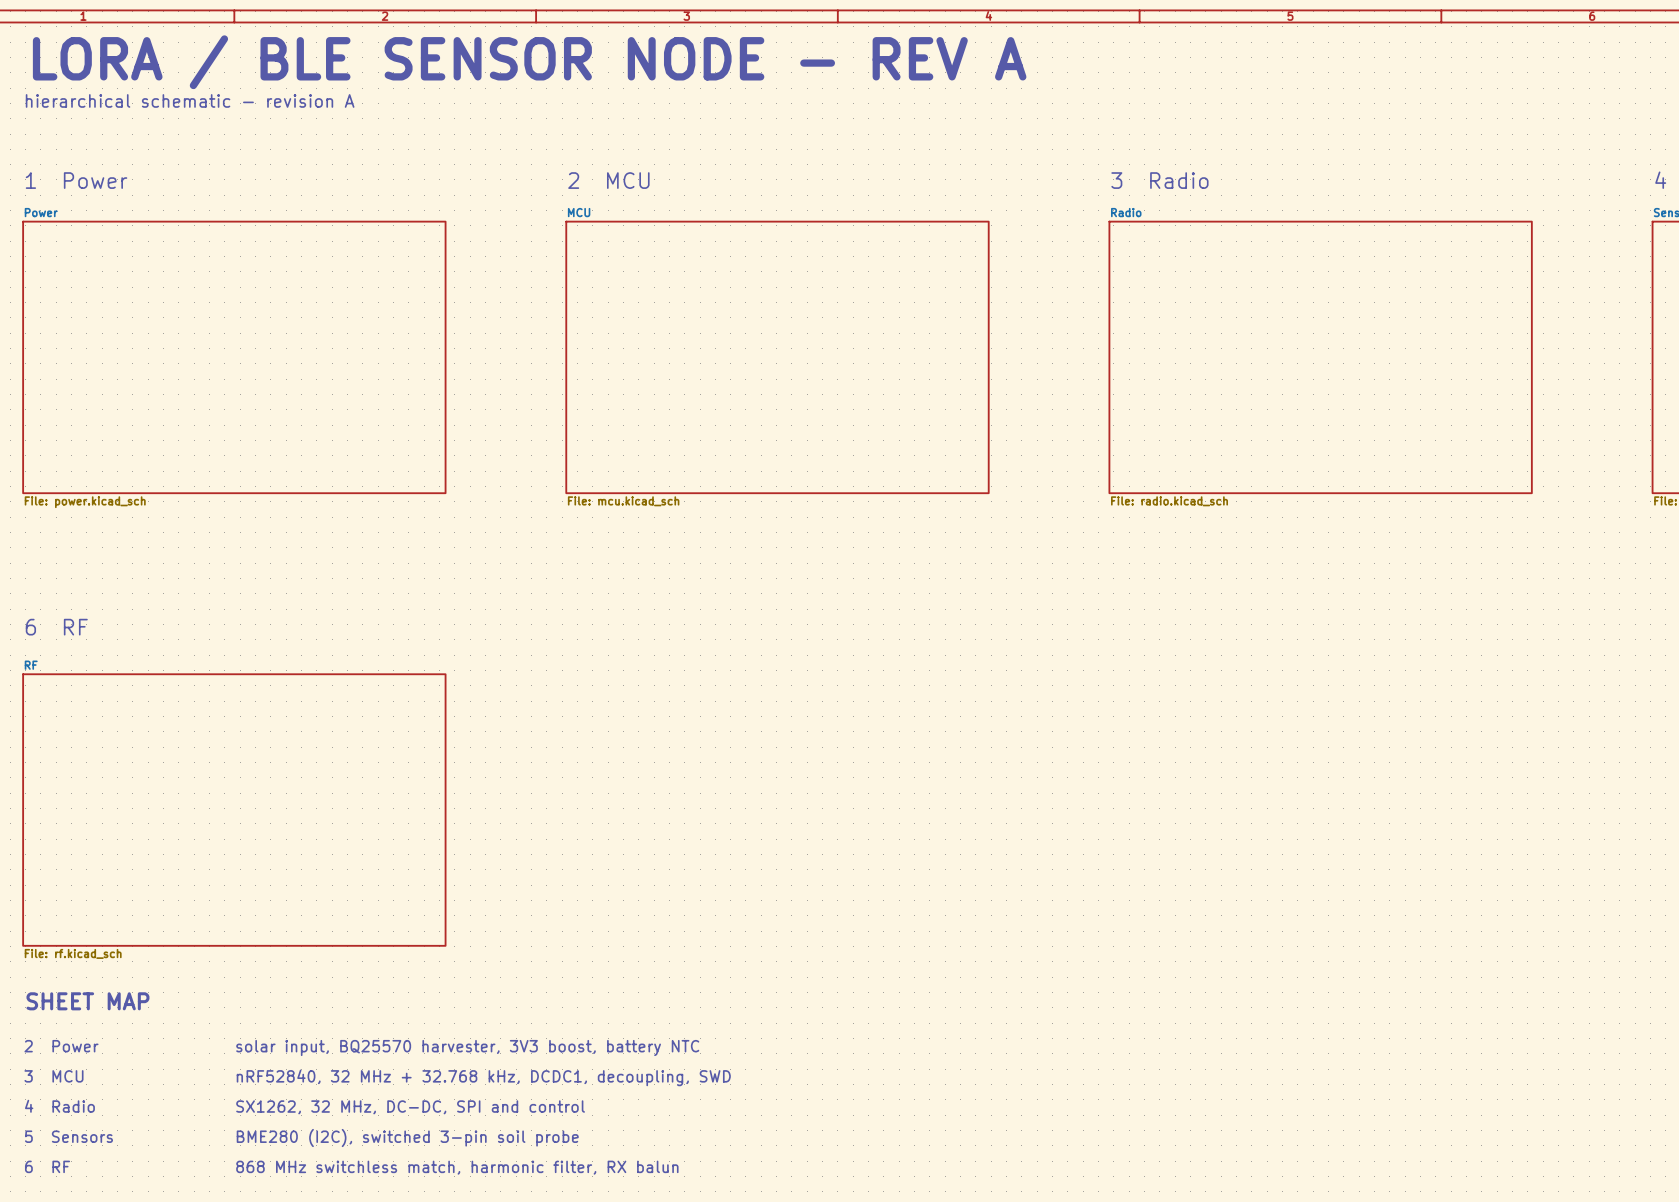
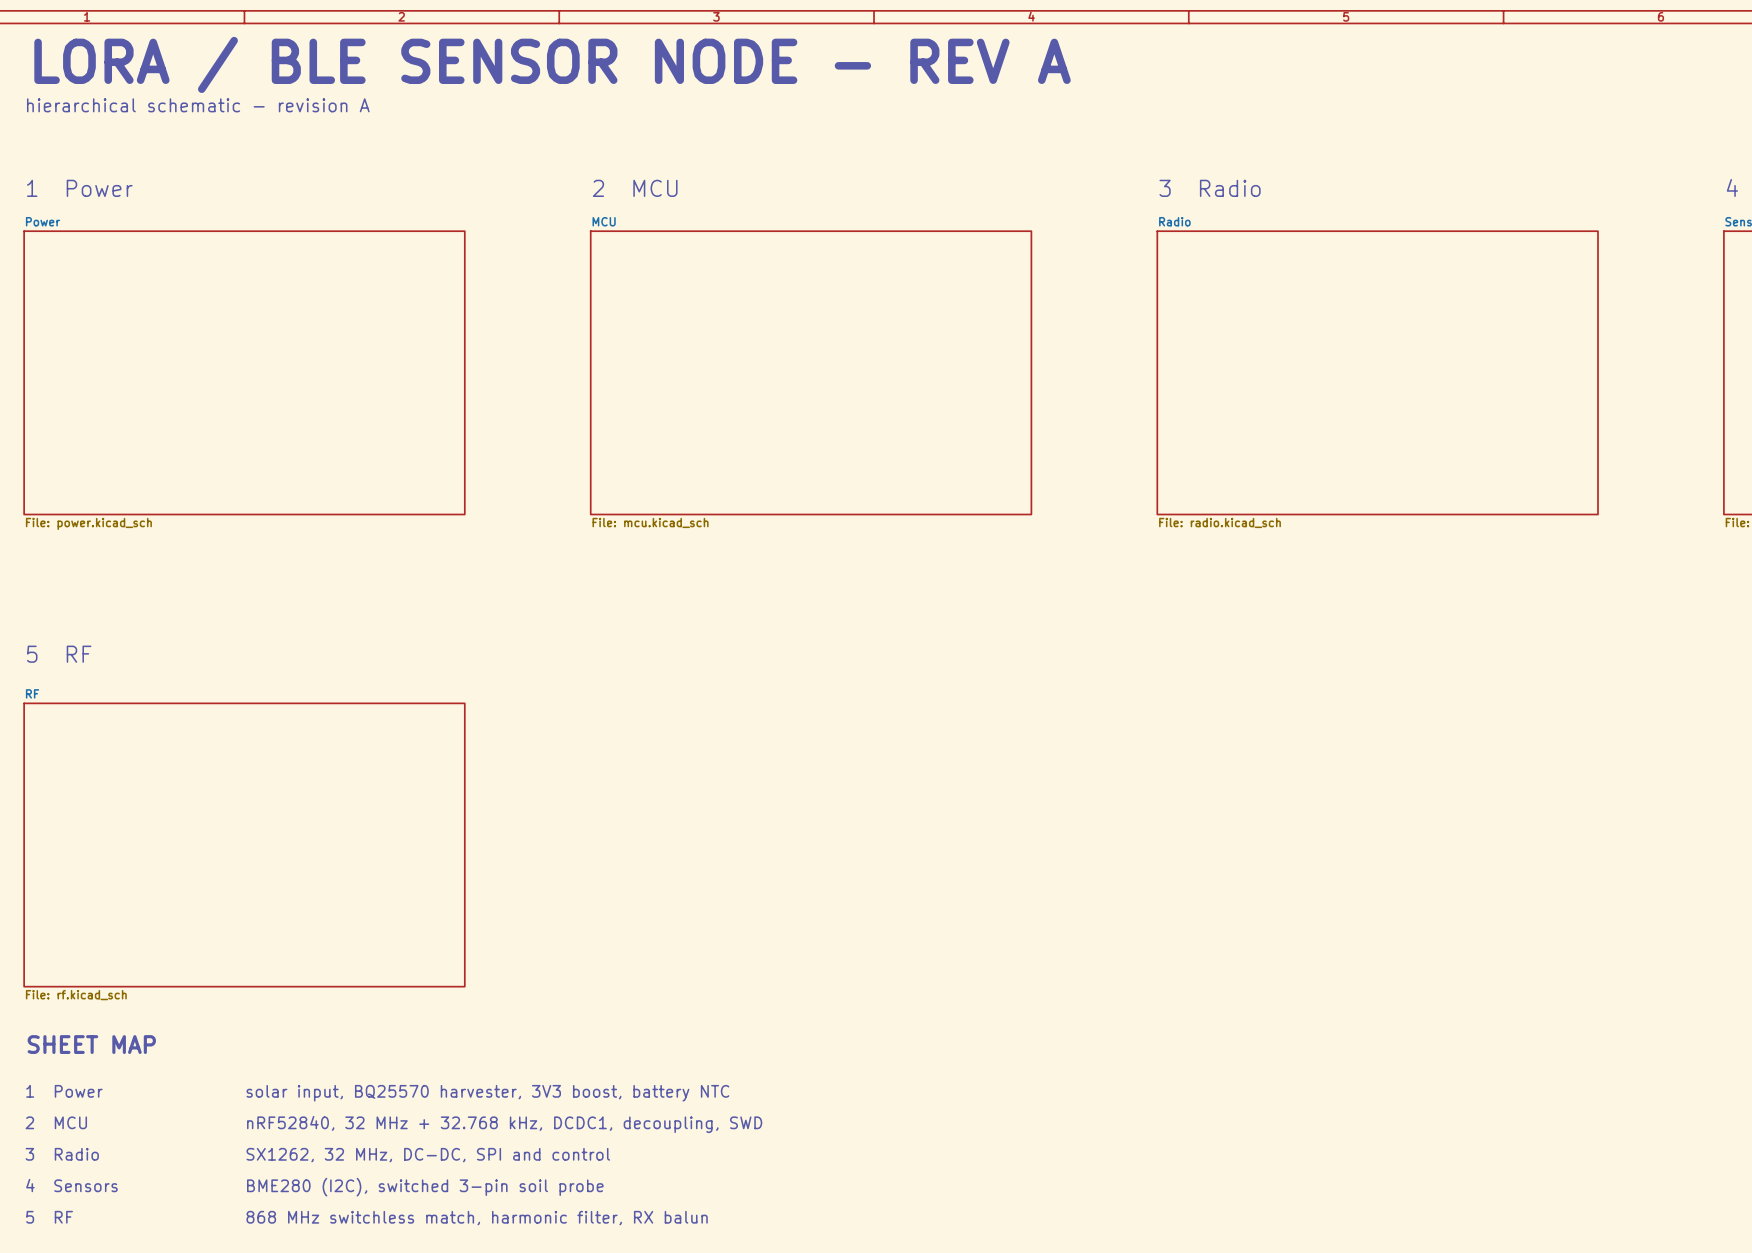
text: 6 RF (56, 627) -> 5 RF (59, 654)
text: 2 Power (61, 1046) -> 1 Power (64, 1091)
text: 3 MCU (53, 1076) -> 2 MCU (56, 1122)
text: 4 Radio (59, 1106) -> 3 Radio (62, 1154)
text: 5 Sensors (68, 1136) -> 4 Sensors (71, 1185)
text: 6 RF (47, 1166) -> 5 RF (49, 1217)

